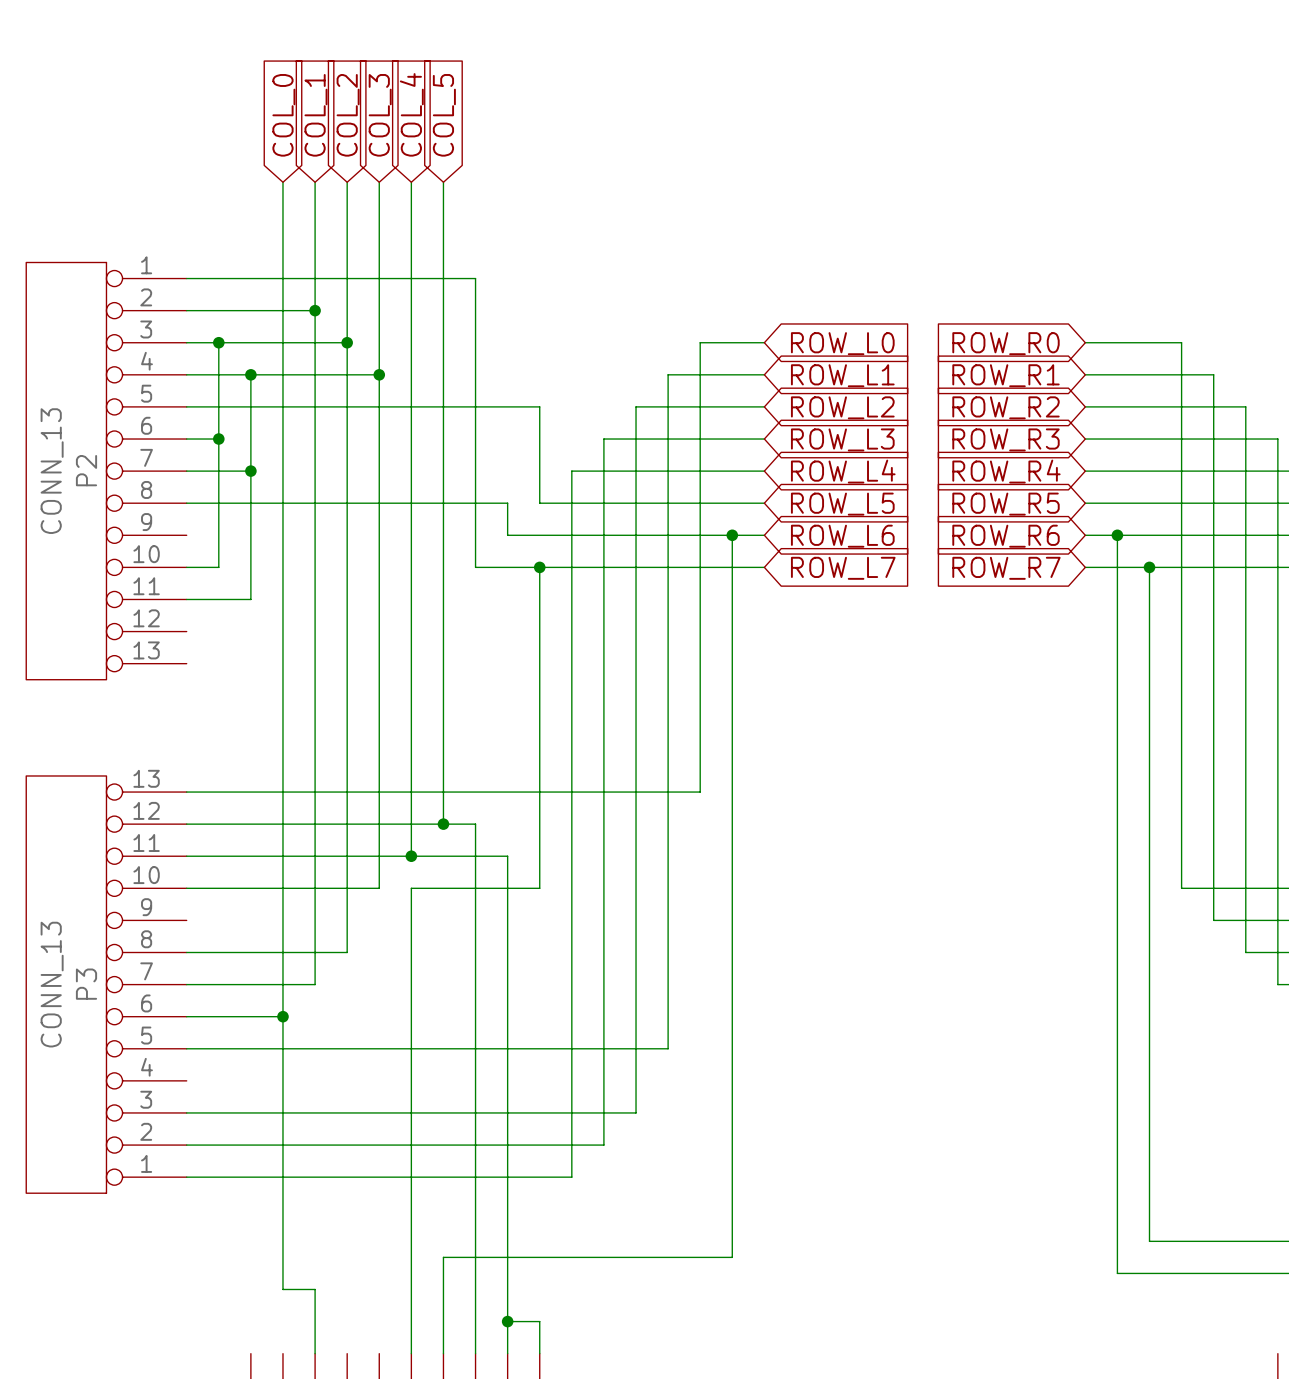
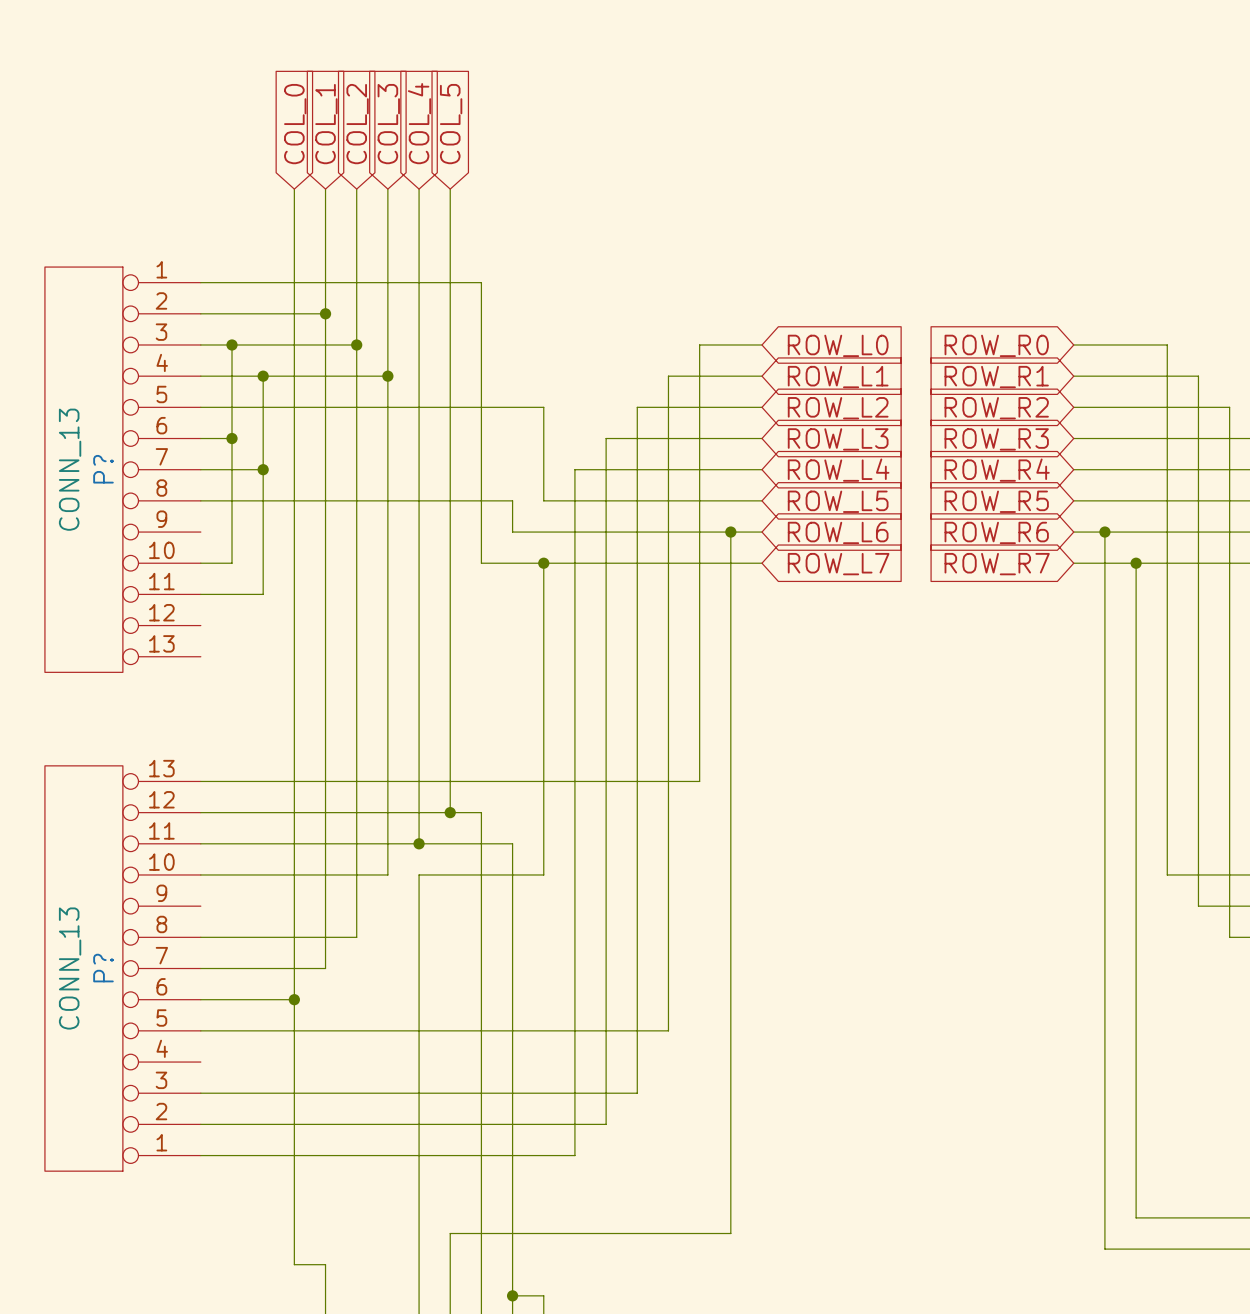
P2 name: P2 (86, 470) -> P? (103, 469)
P3 name: P3 (86, 984) -> P? (103, 968)

